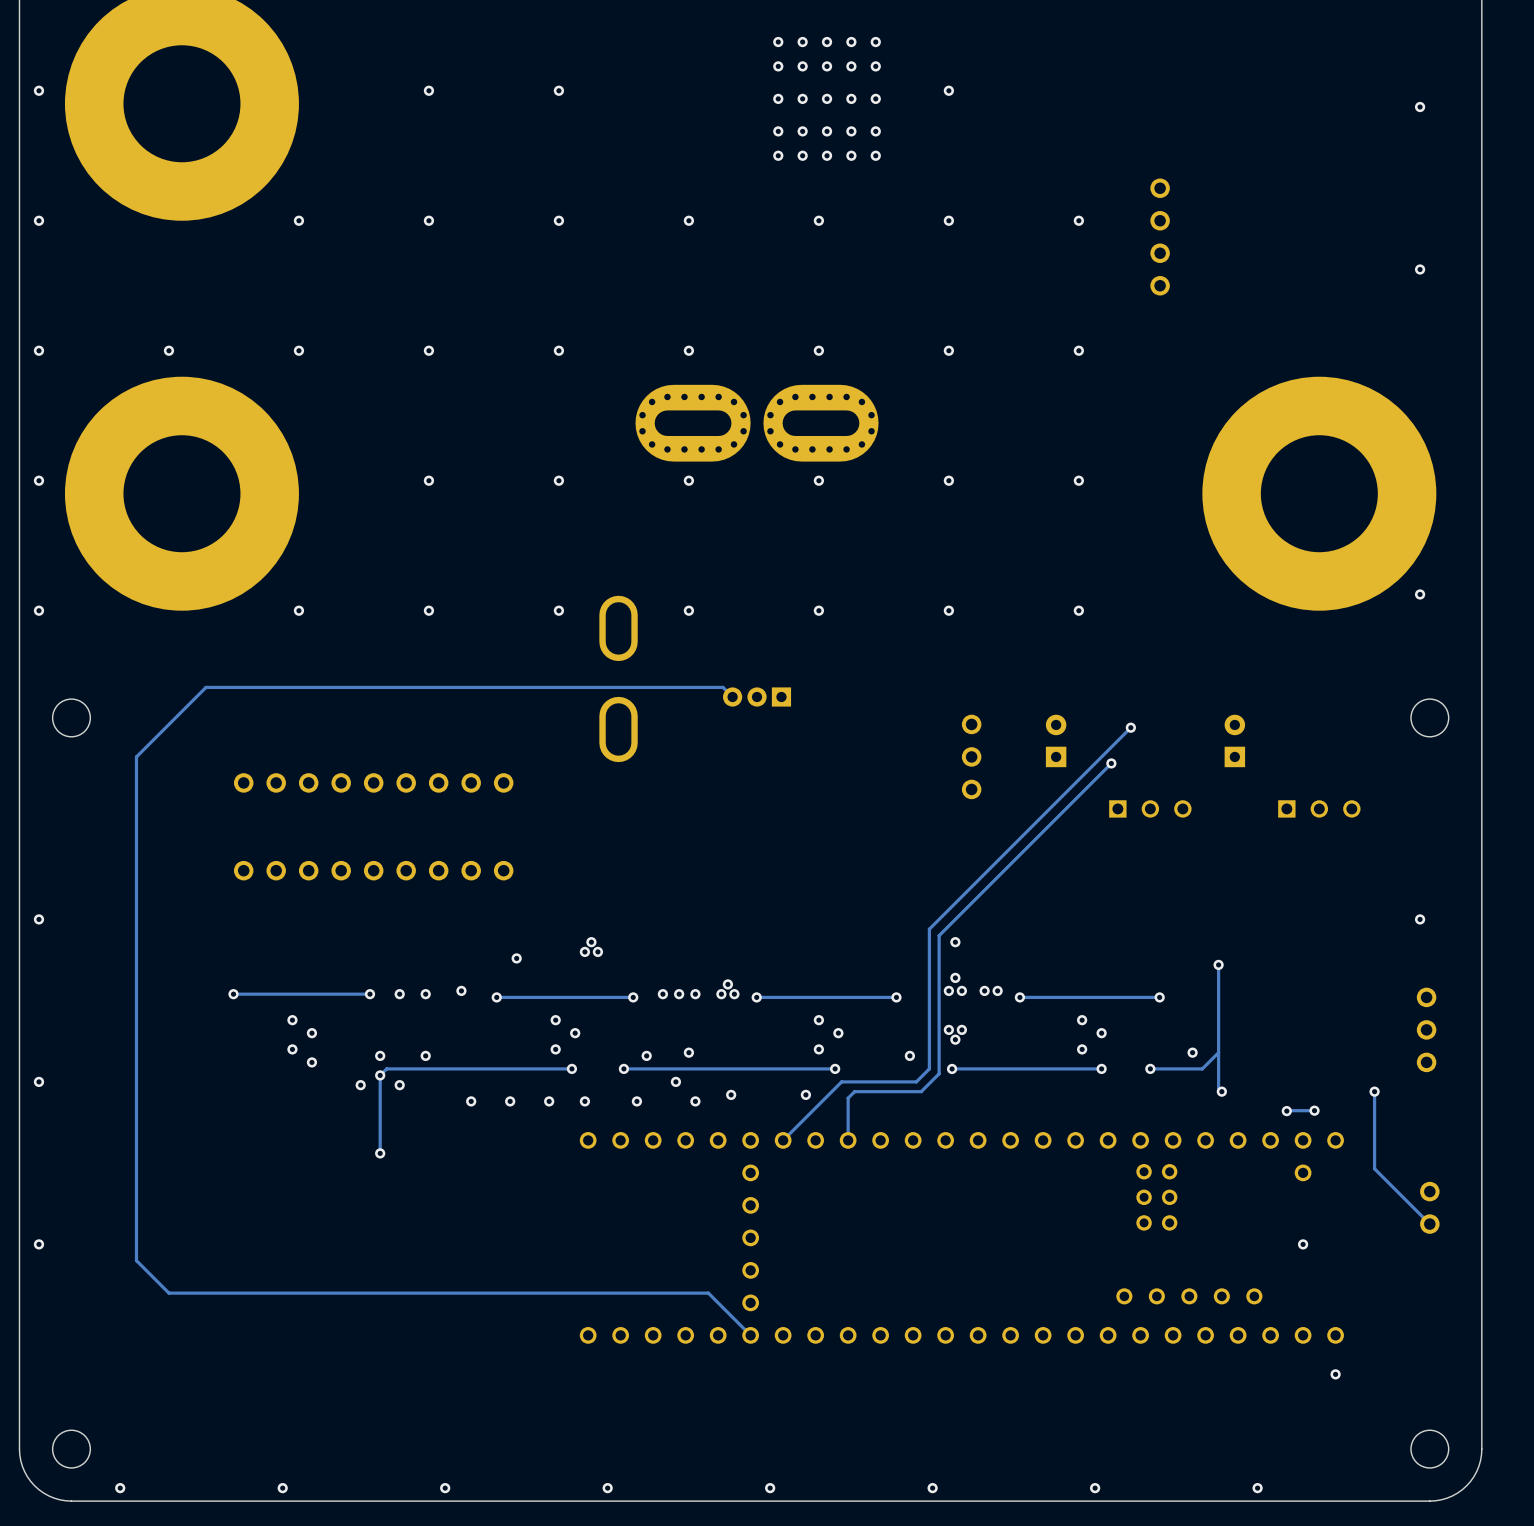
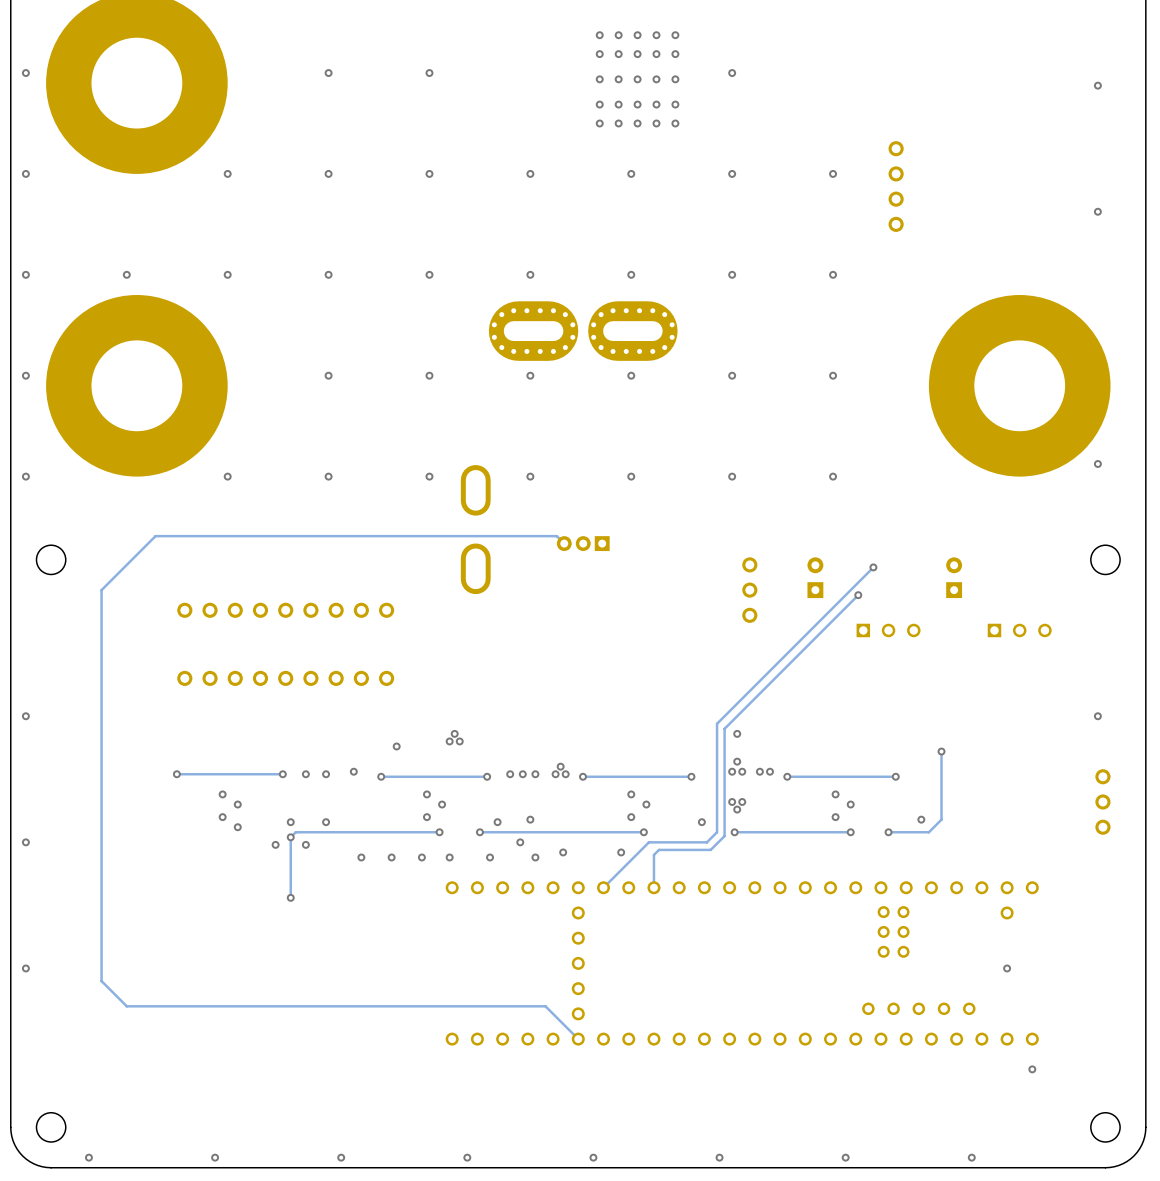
track: (1218, 1052) (1218, 1088) (1221, 1091) -> none
via: (1221, 1091) -> none
track: (1374, 1091) (1374, 1168) (1429, 1224) -> none
via: (1374, 1091) -> none
track: (1314, 1110) (1286, 1111) -> none
via: (1314, 1110) -> none
via: (1286, 1111) -> none
part: (1429, 1207) -> none

